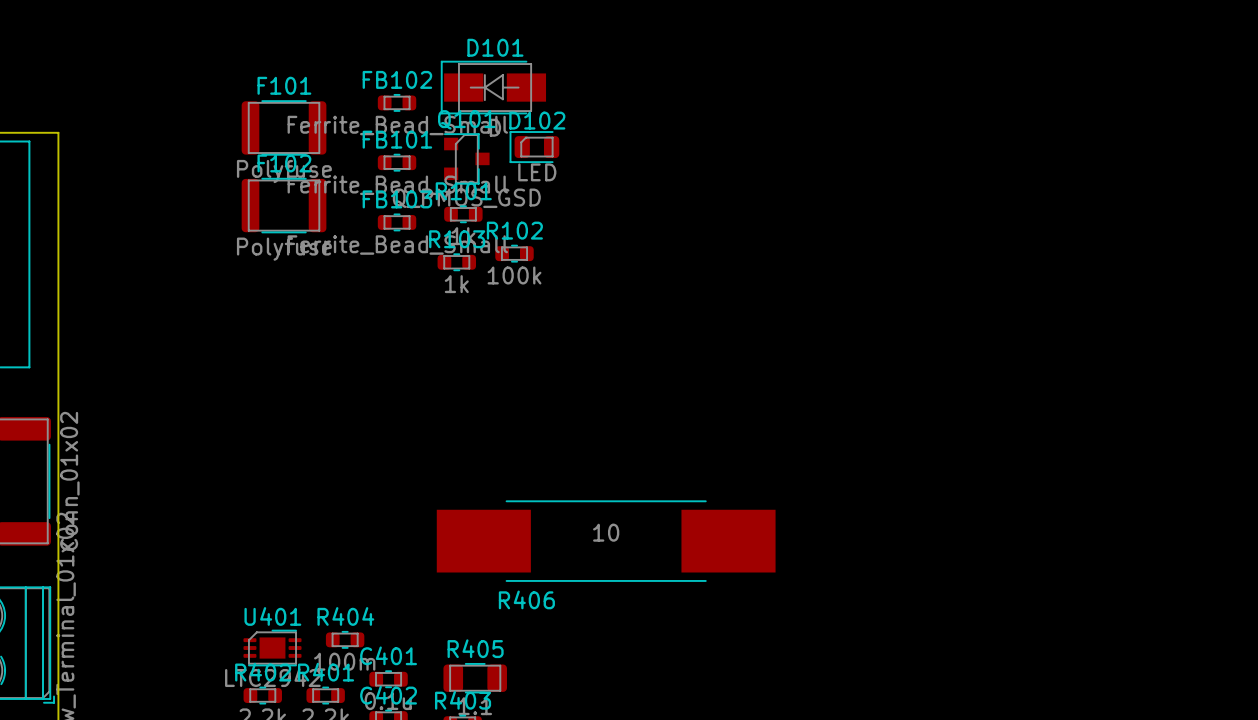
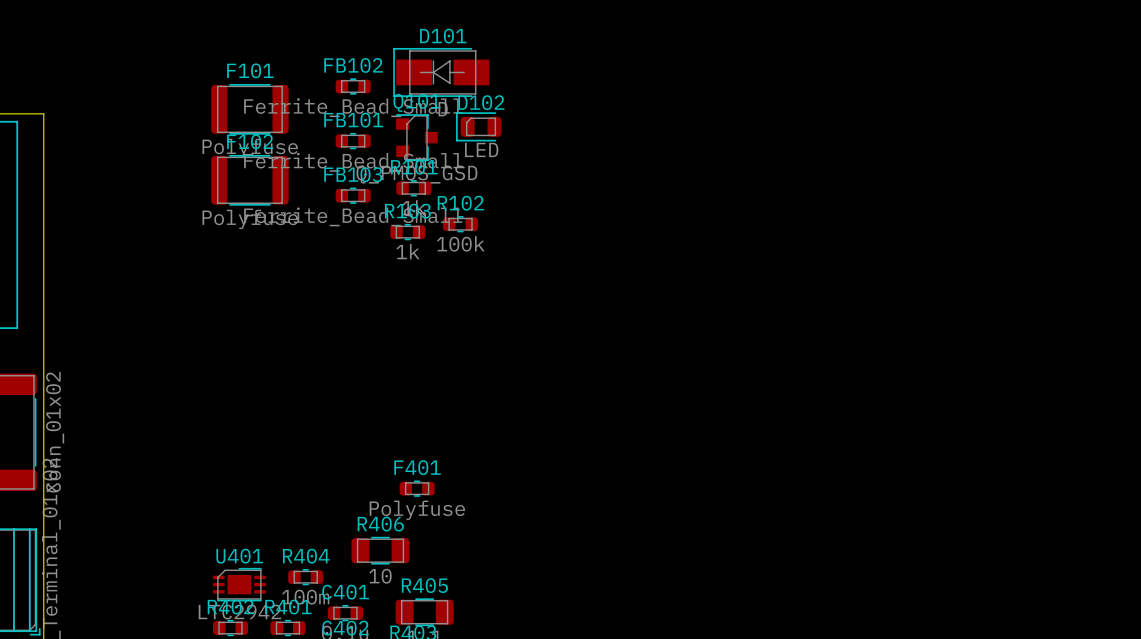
R406 footprint: [436, 500, 776, 582] -> [351, 536, 410, 565]
R406 value position: 10 (606, 532) -> 10 (380, 576)
F401: none -> Polyfuse (417, 488)
R406 name position: R406 (526, 599) -> R406 (380, 524)

